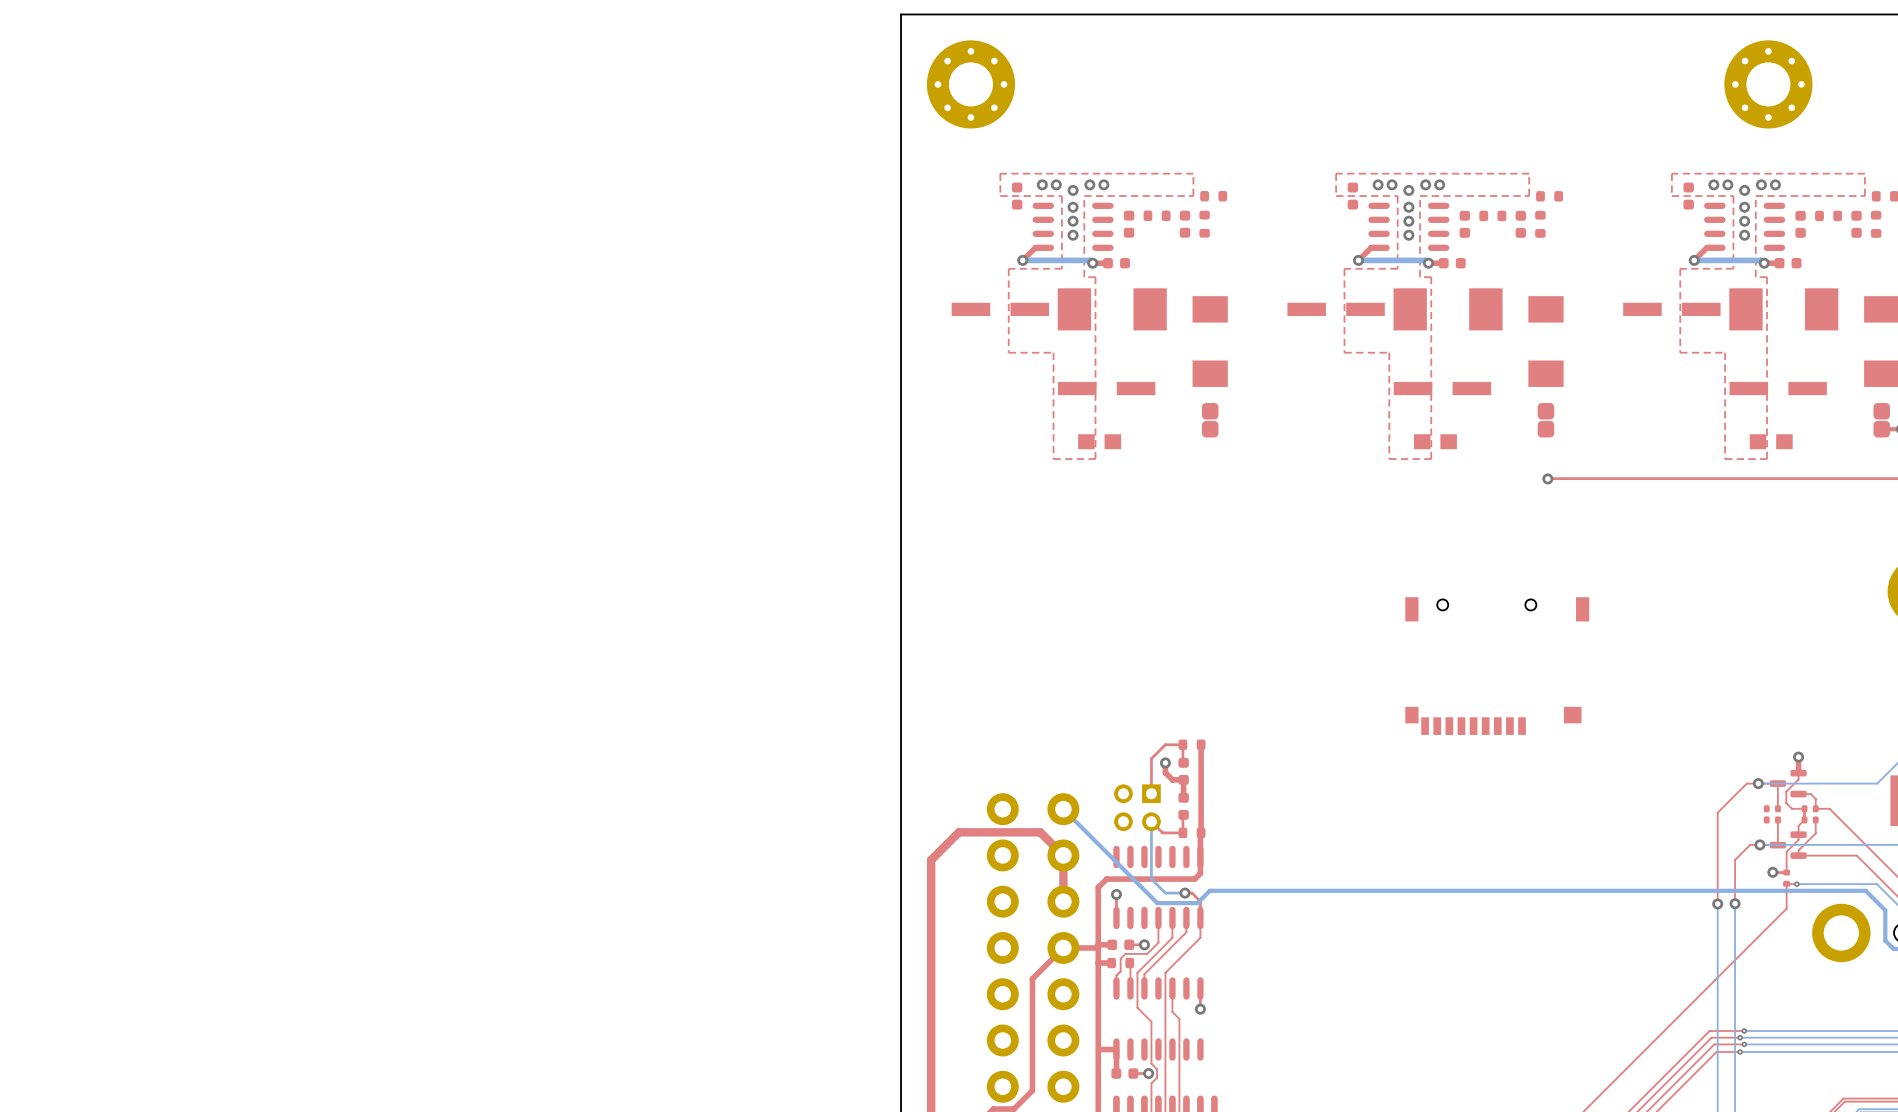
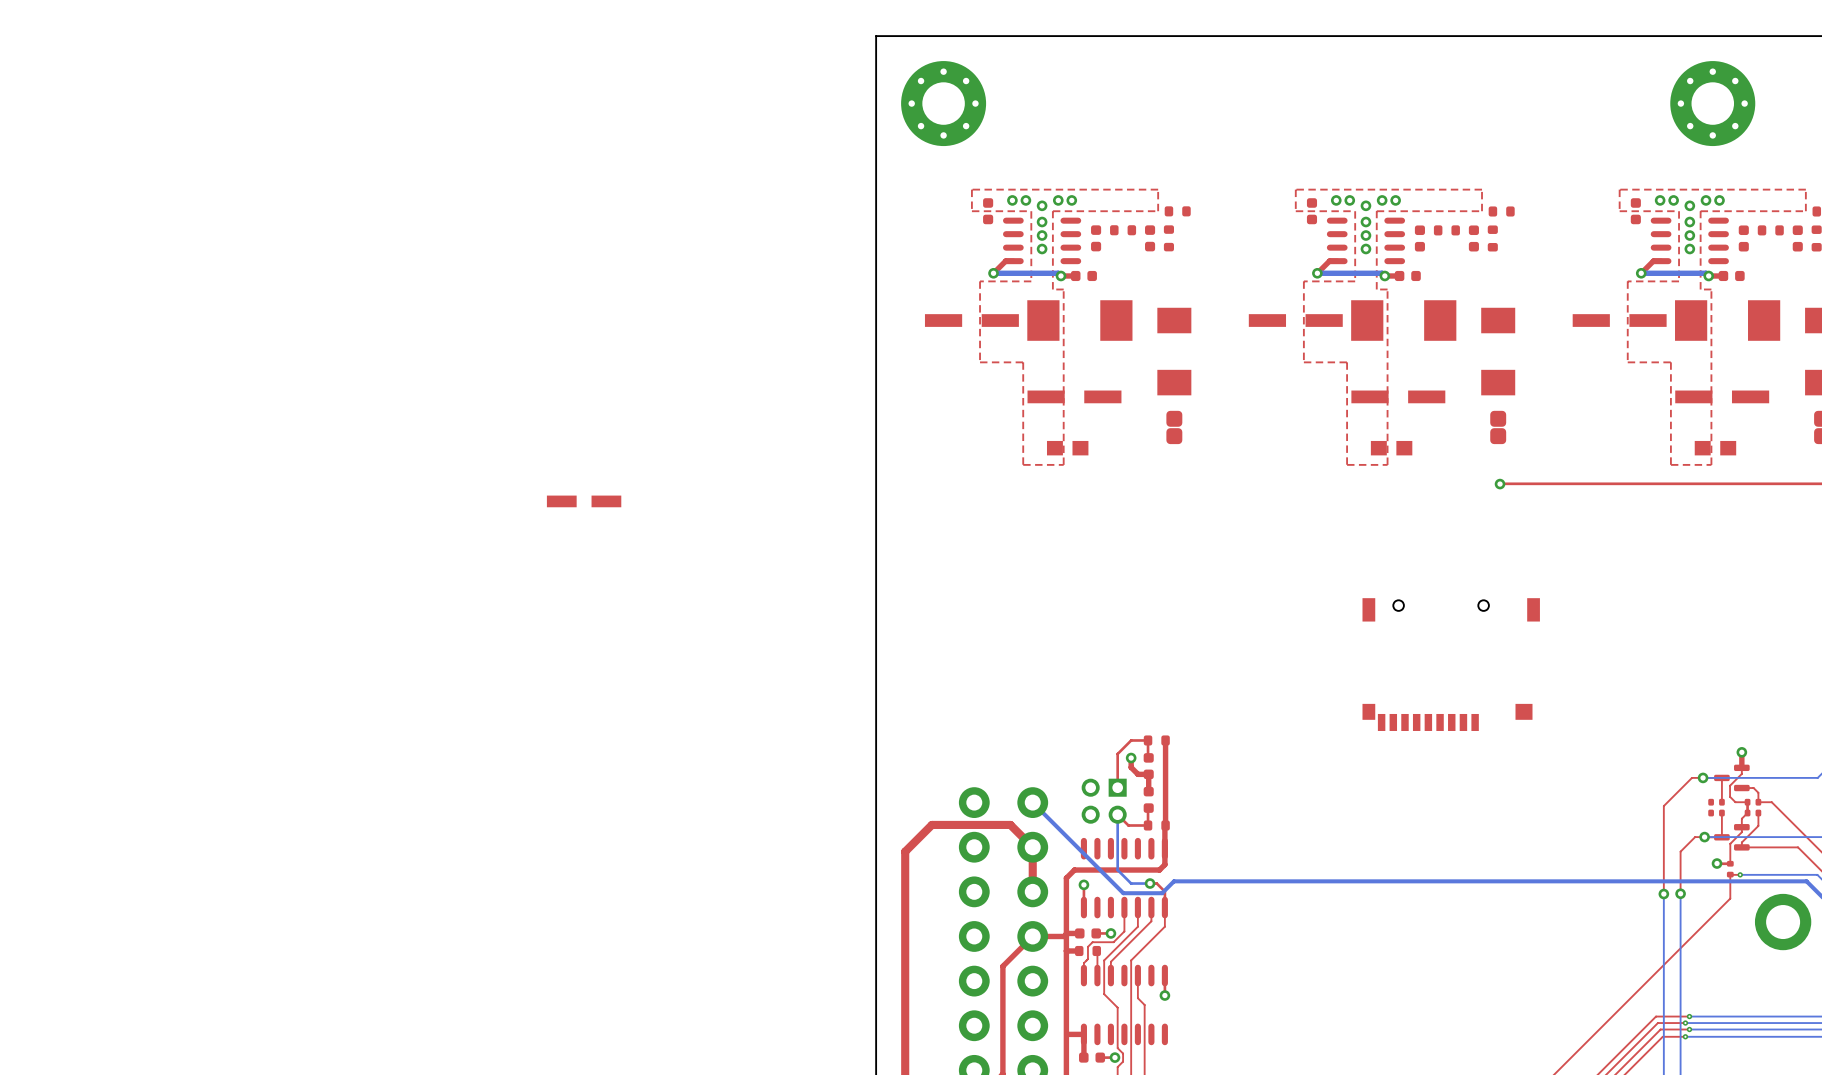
part: none -> (584, 501)

